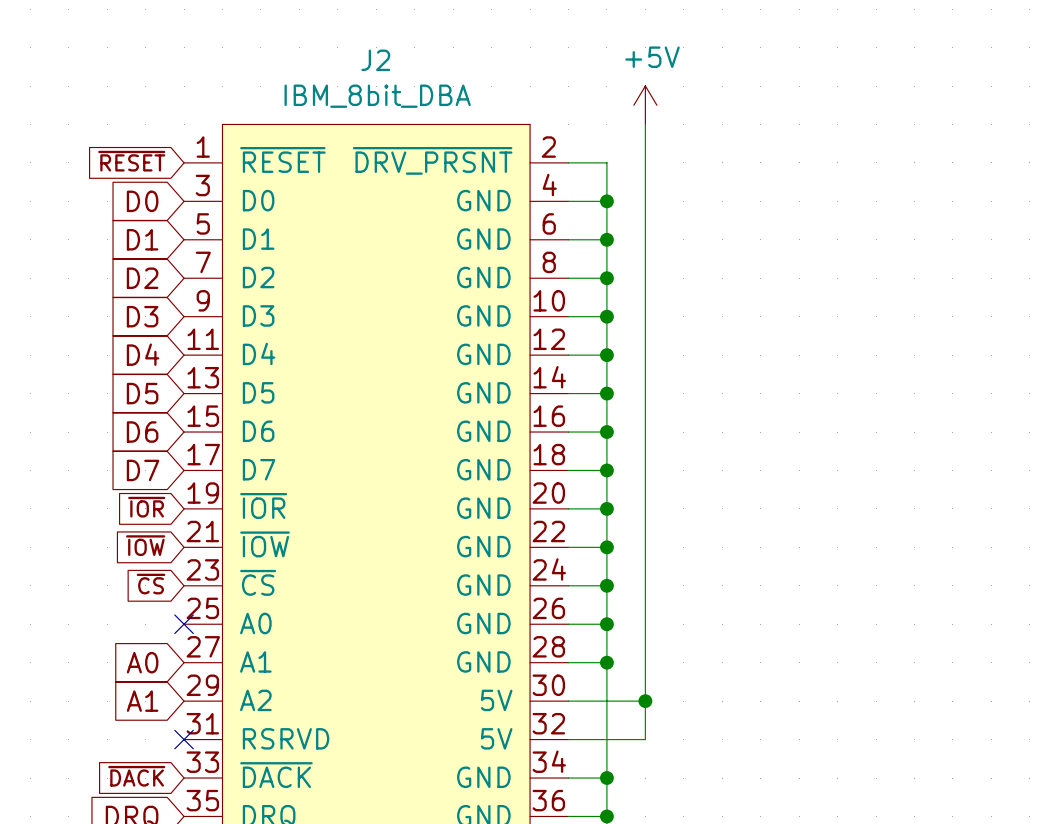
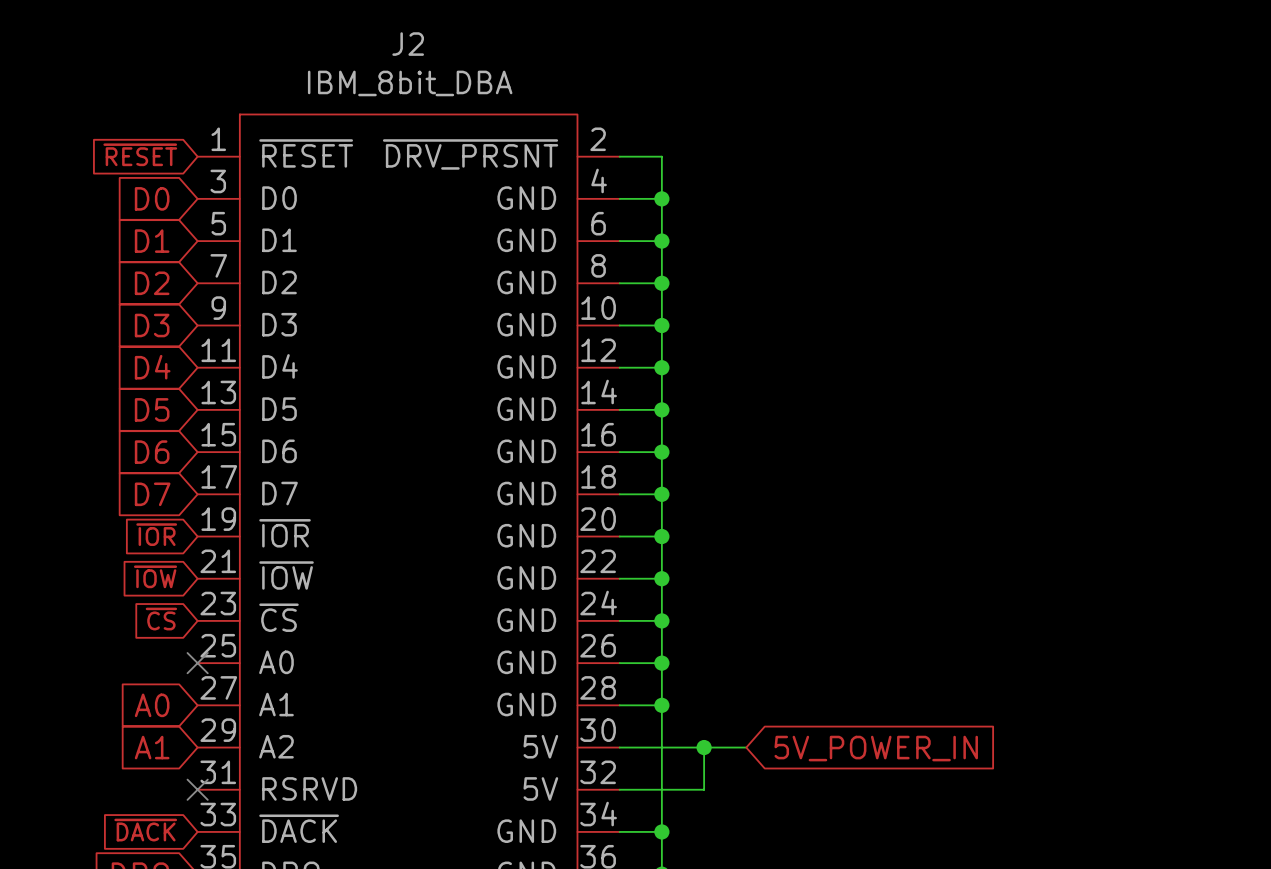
power symbol: +5V (645, 105) -> none
wire: (645, 124) (645, 701) -> (746, 747) (704, 747)
global label: none -> 5V_POWER_IN (876, 748)

